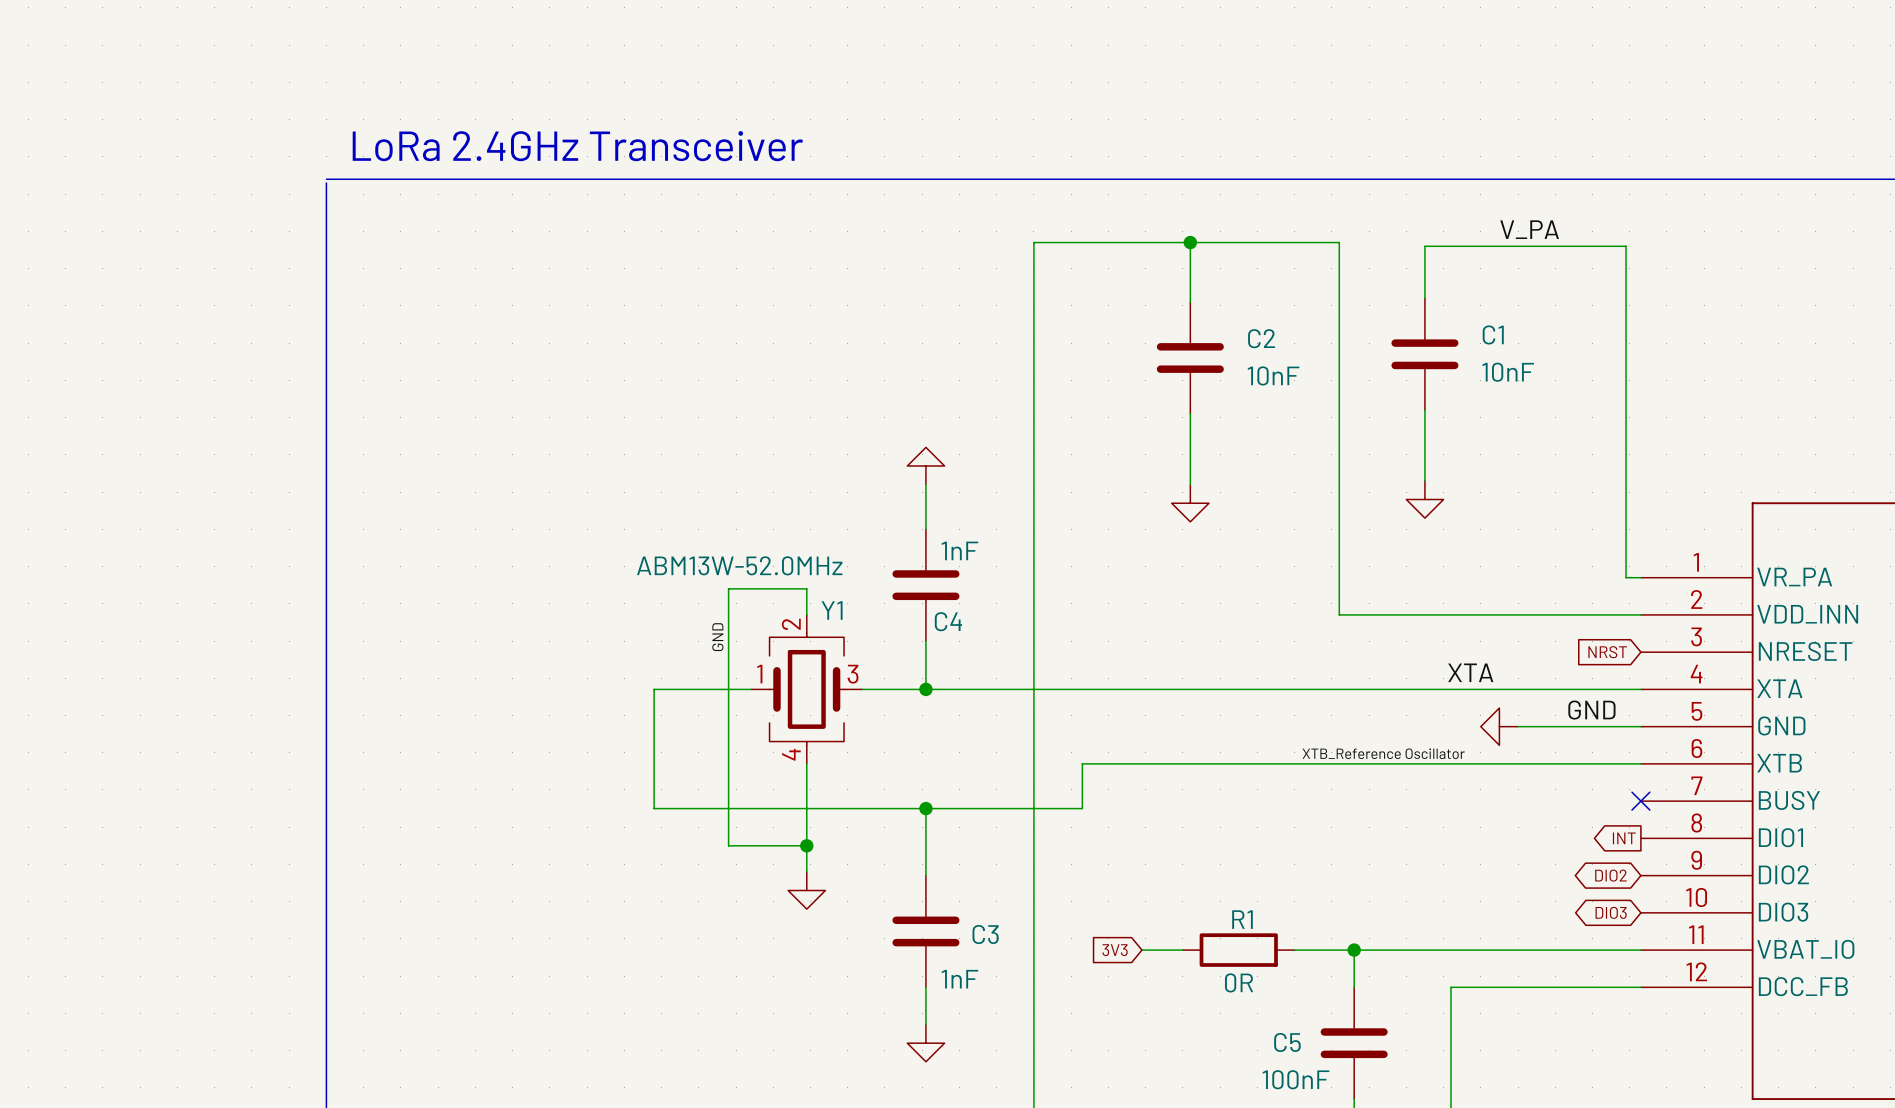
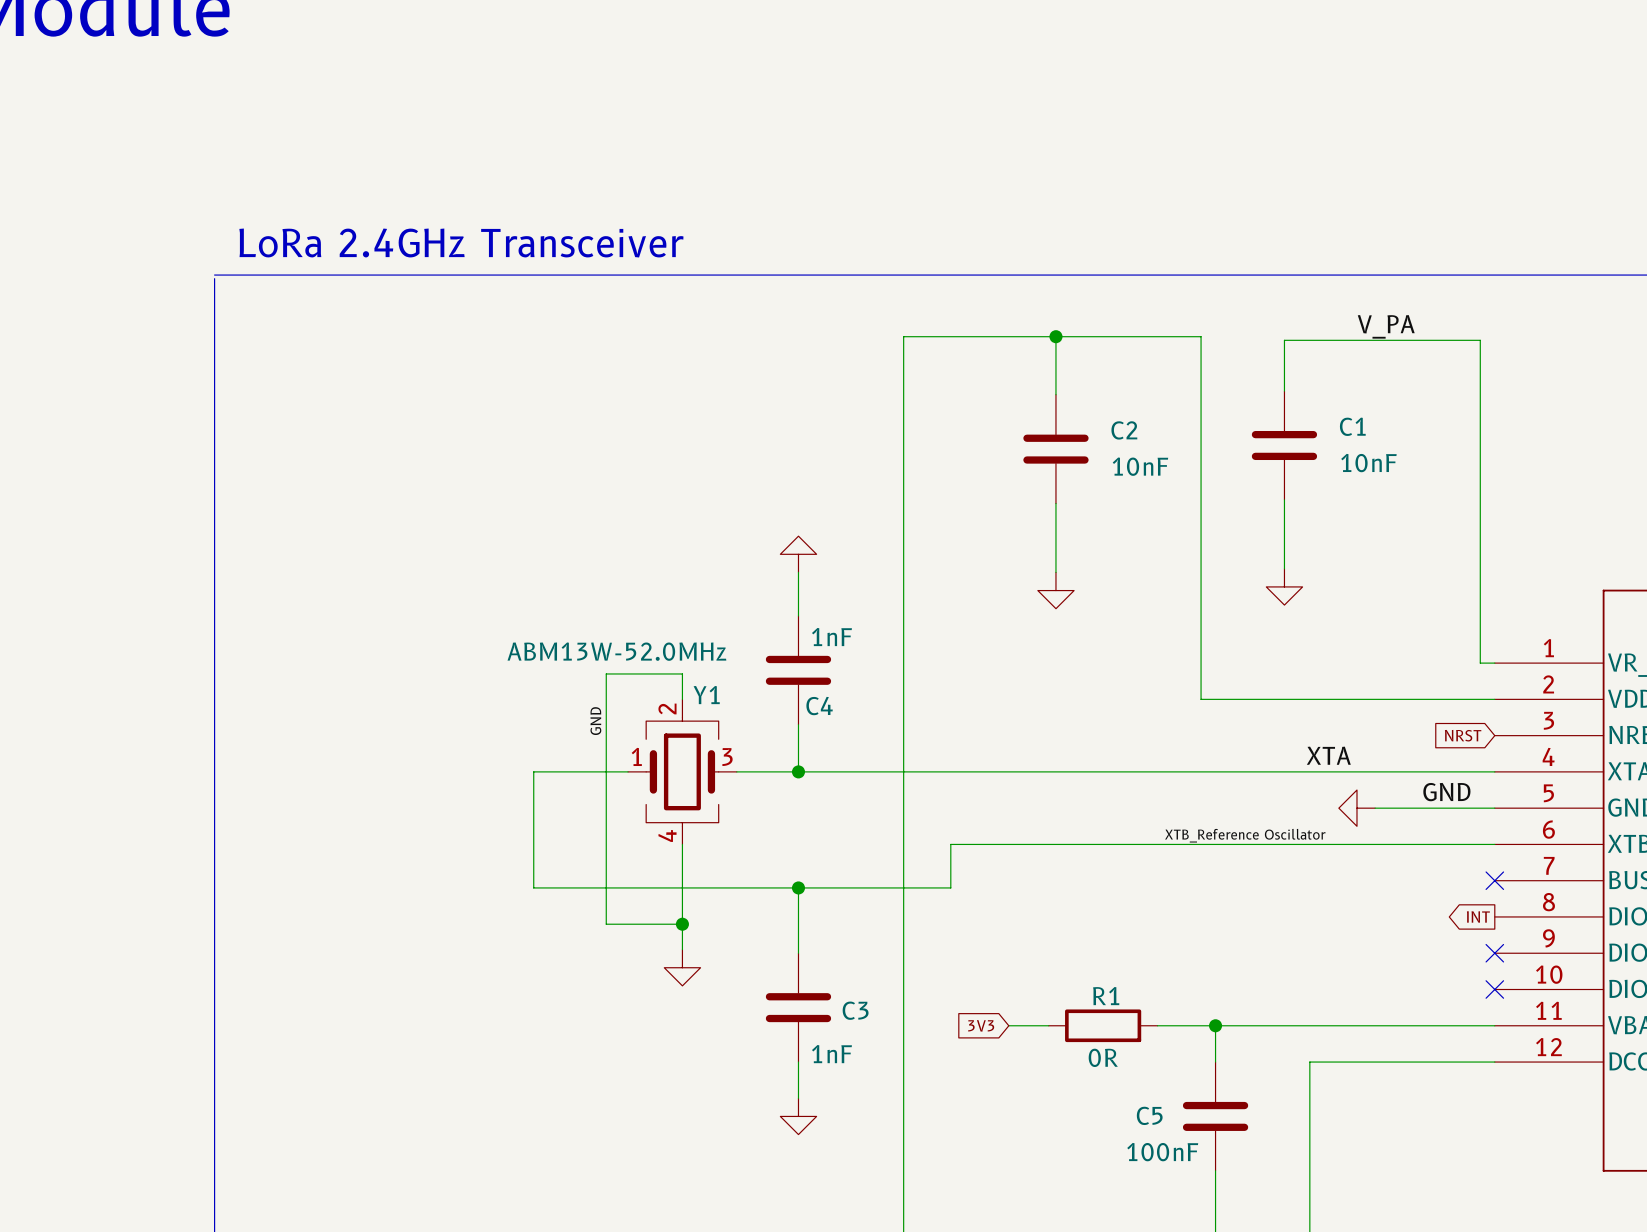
global label: DIO2 (1610, 875) -> none
no-connect mark: none -> (1494, 953)
global label: DIO3 (1611, 912) -> none
no-connect mark: none -> (1494, 989)

